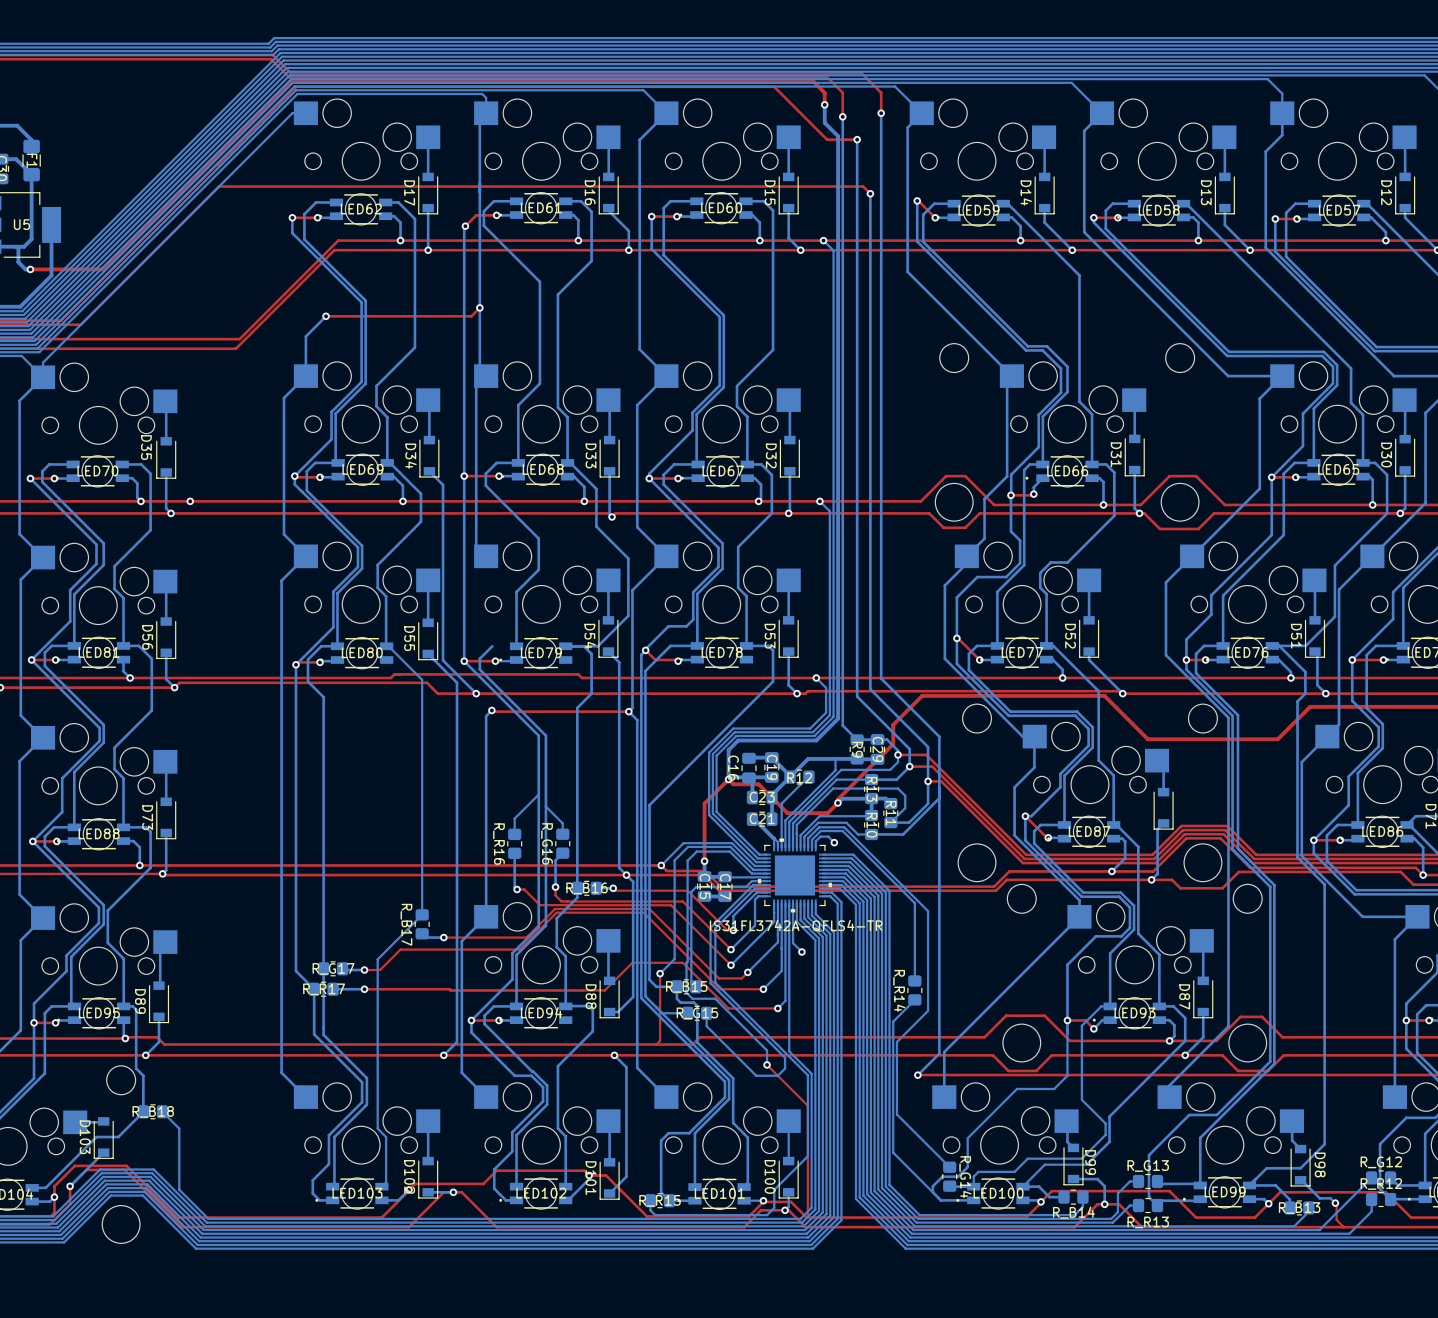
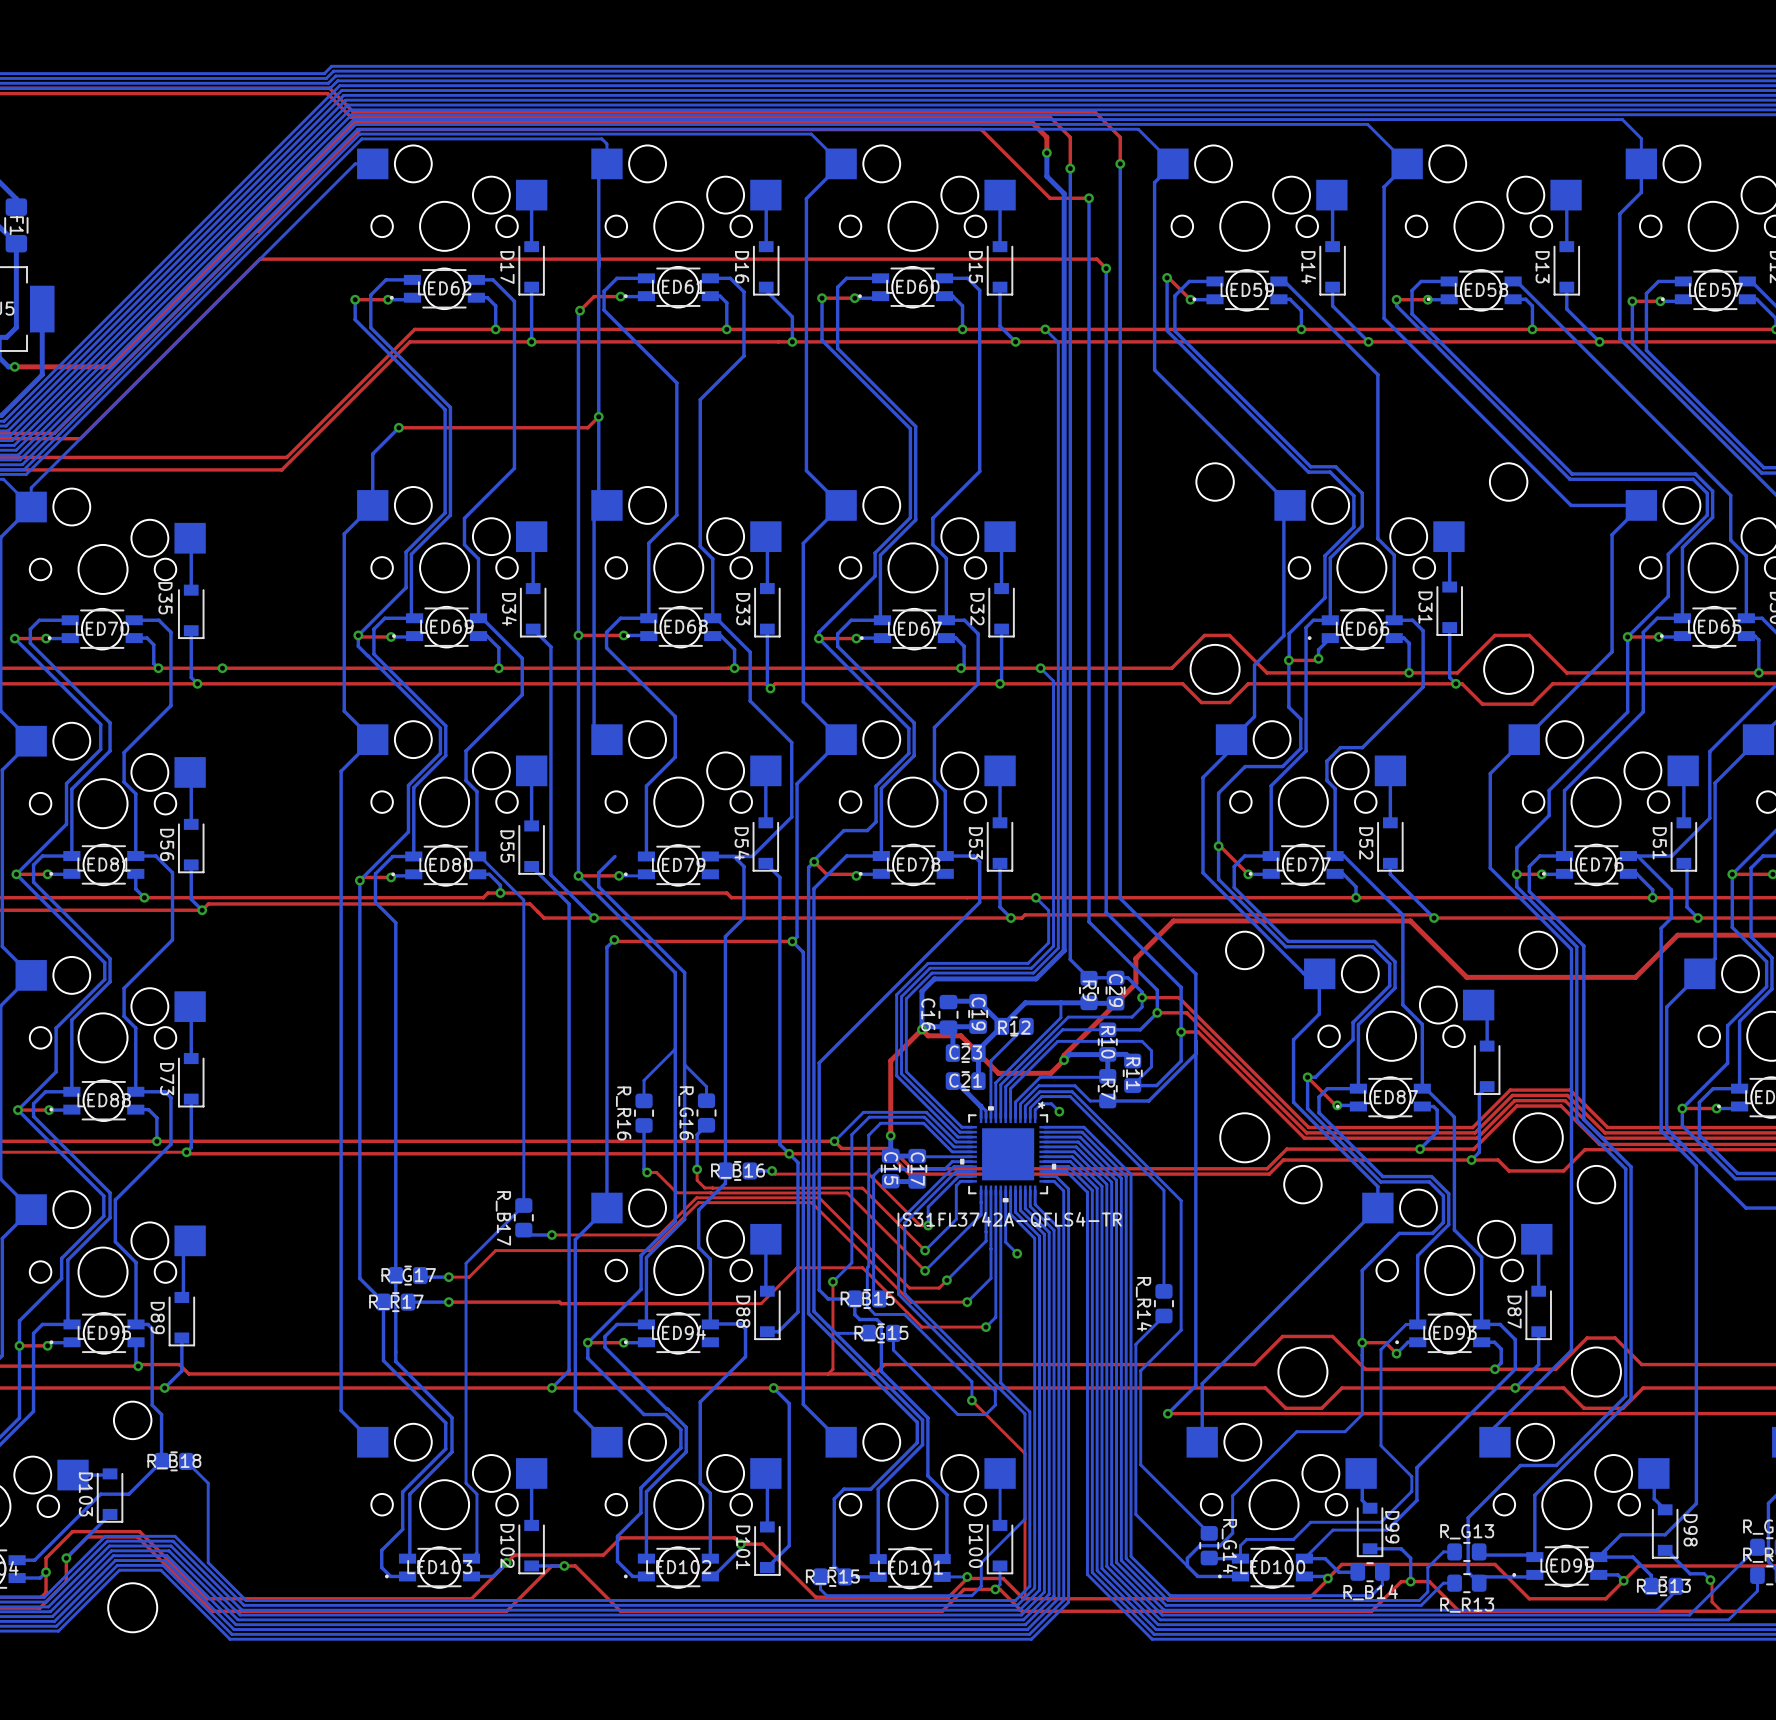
bottom track: none -> (477, 874) (489, 874) (500, 885) (500, 893)
via: none -> (500, 893)
R13 name: R13 (871, 789) -> R10 (1108, 1042)
R10 name: R10 (871, 825) -> R7 (1108, 1089)
part text: none -> * (1041, 1105)

